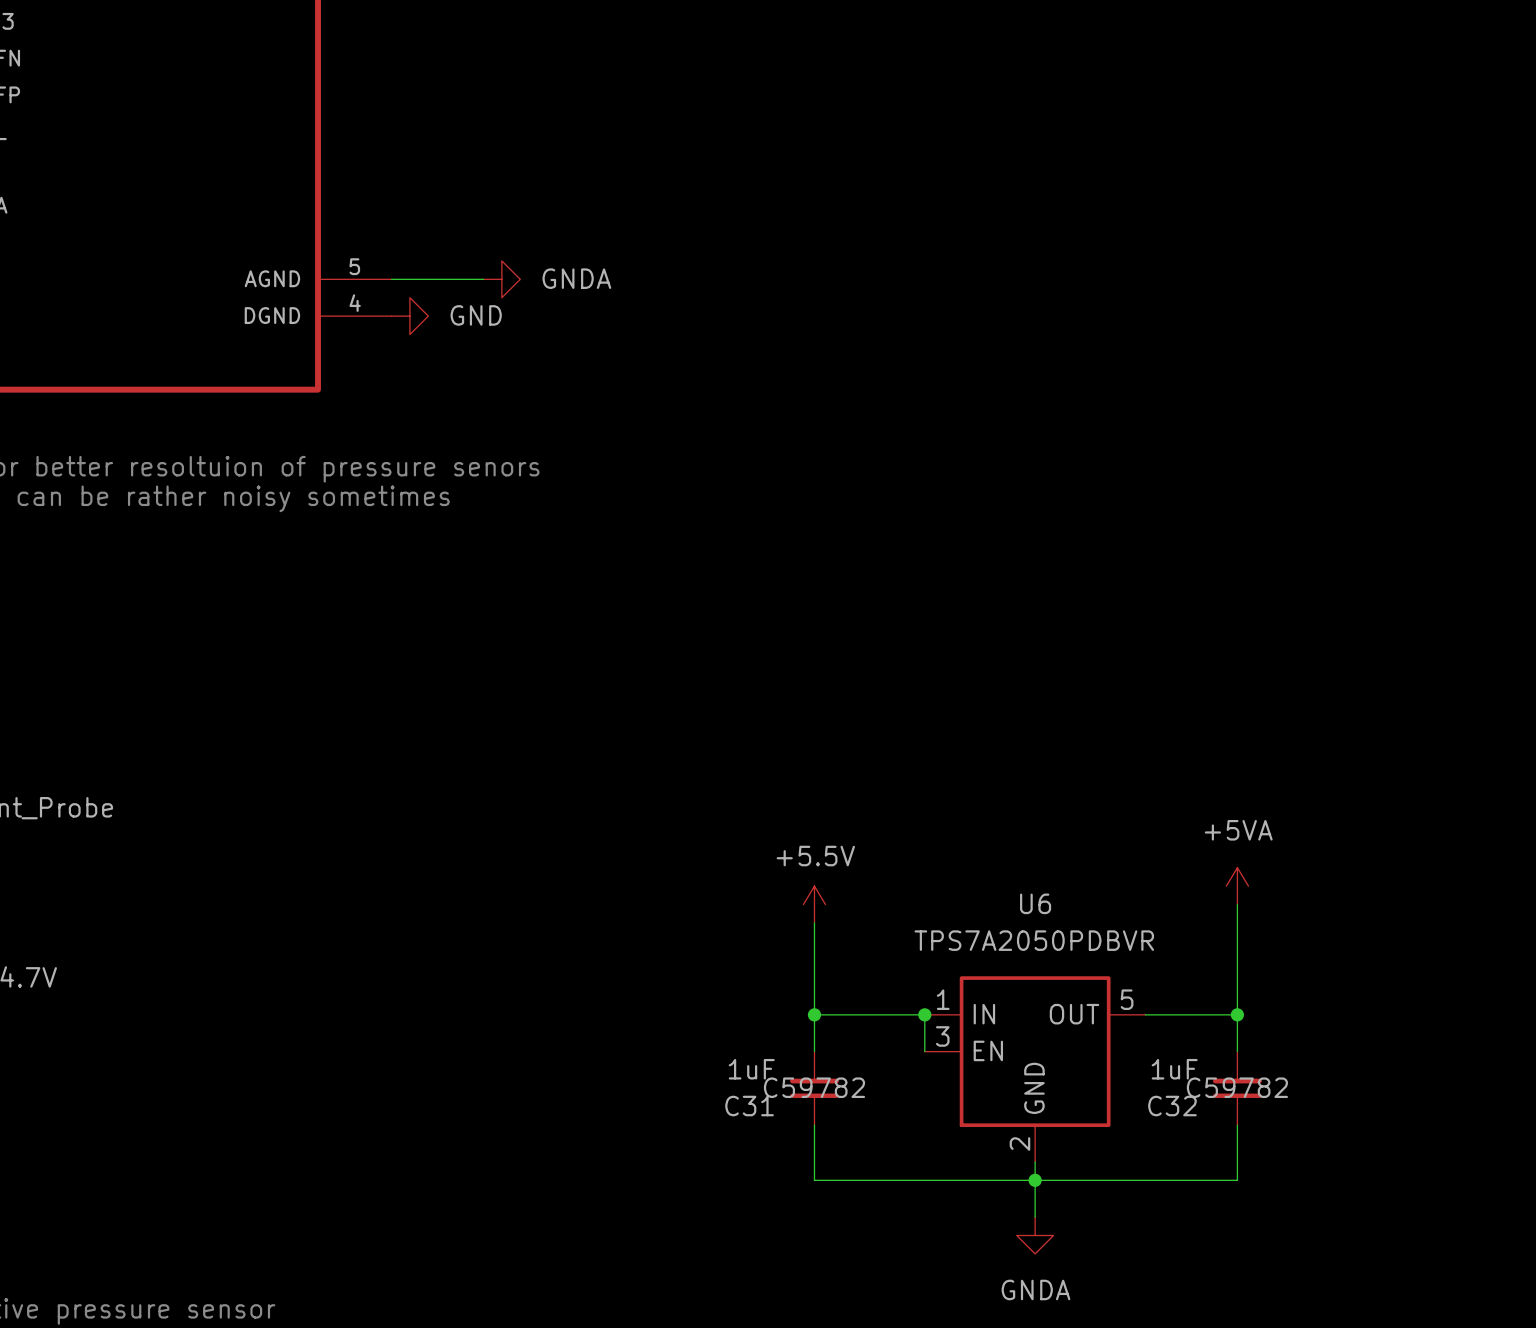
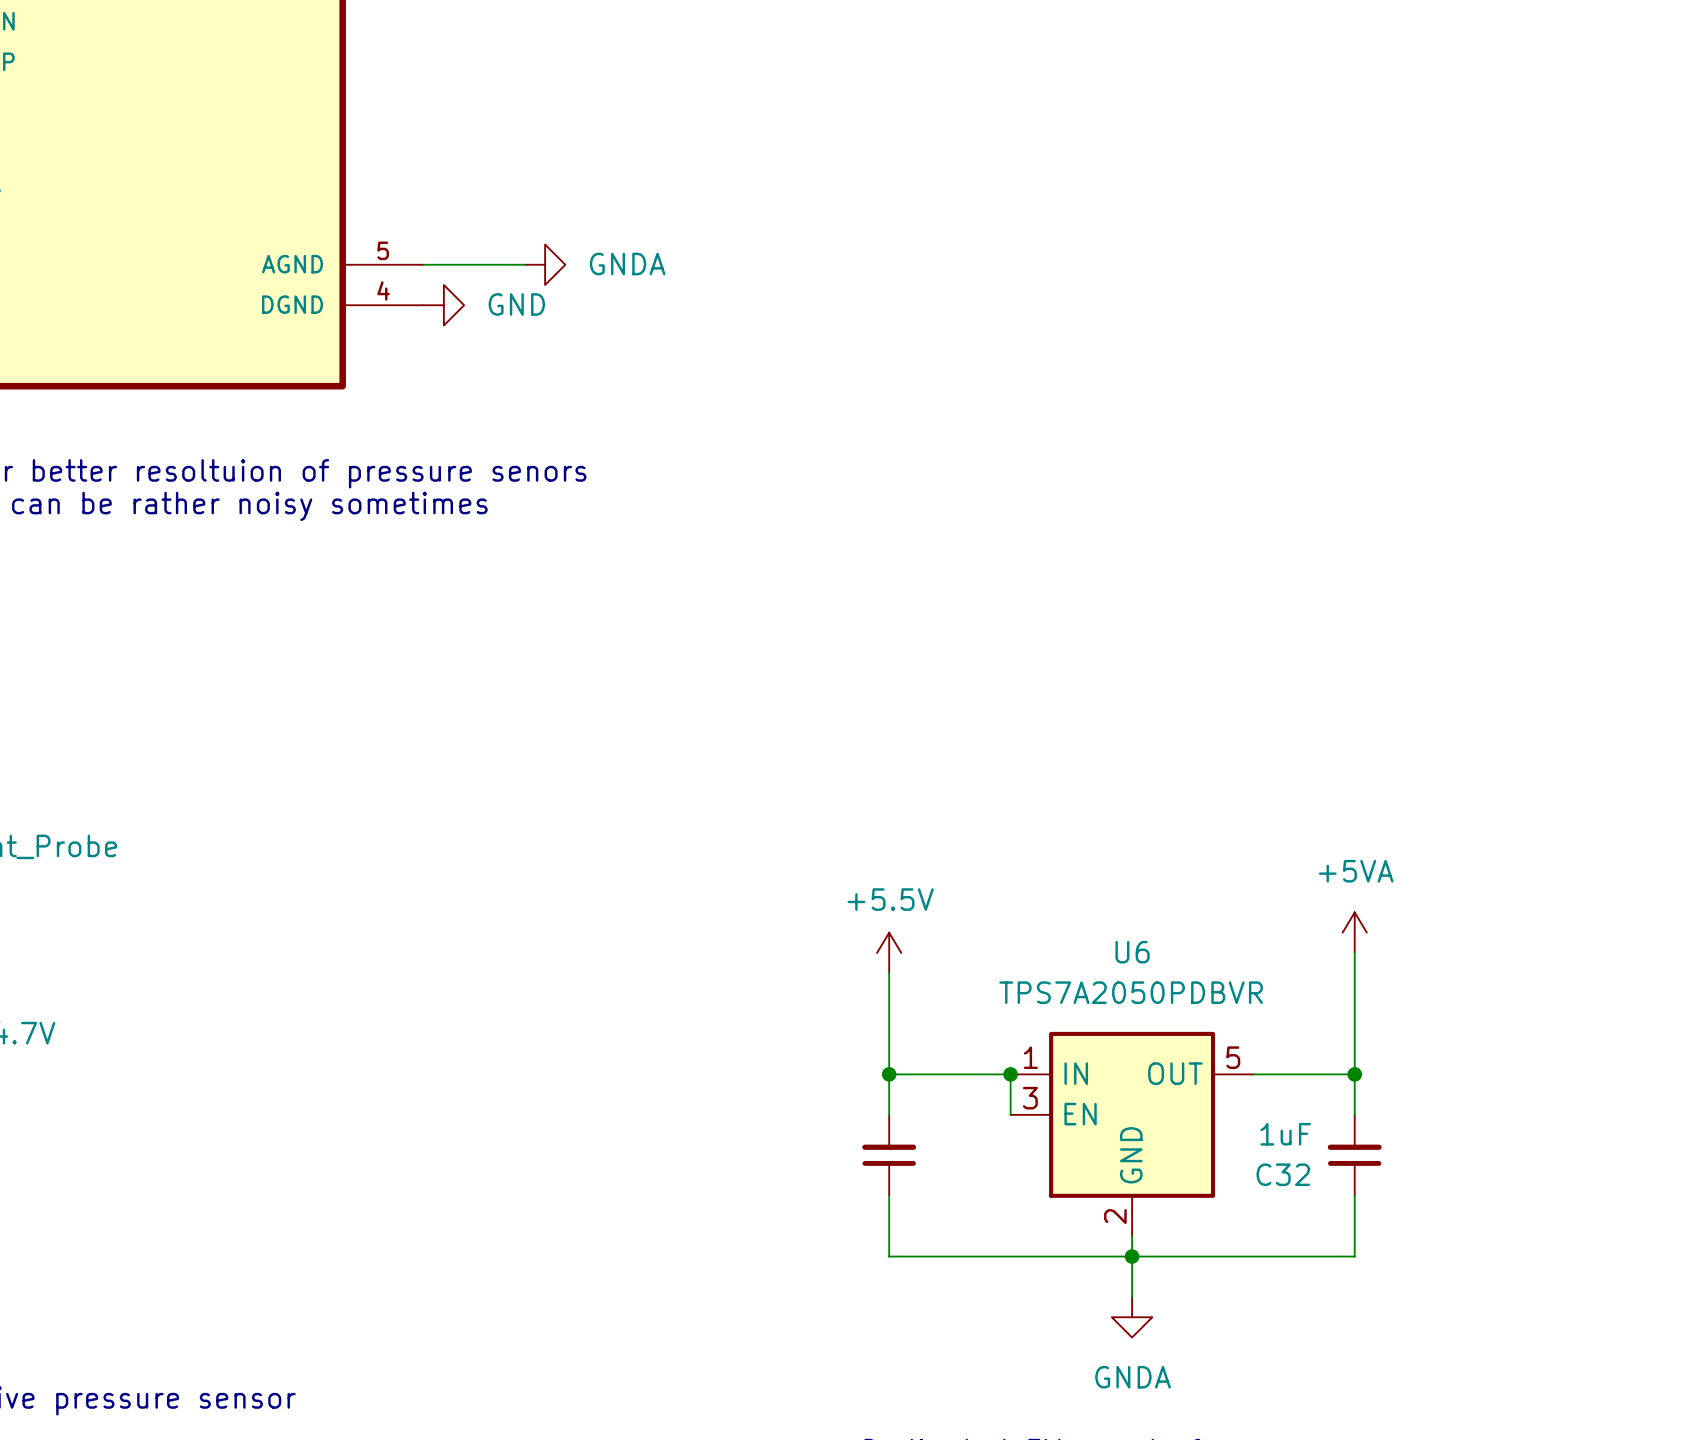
C31 value: 1uF (751, 1069) -> none
C31 text: C59782 (814, 1087) -> none
C32 text: C59782 (1237, 1087) -> none
C31 name: C31 (749, 1106) -> none

